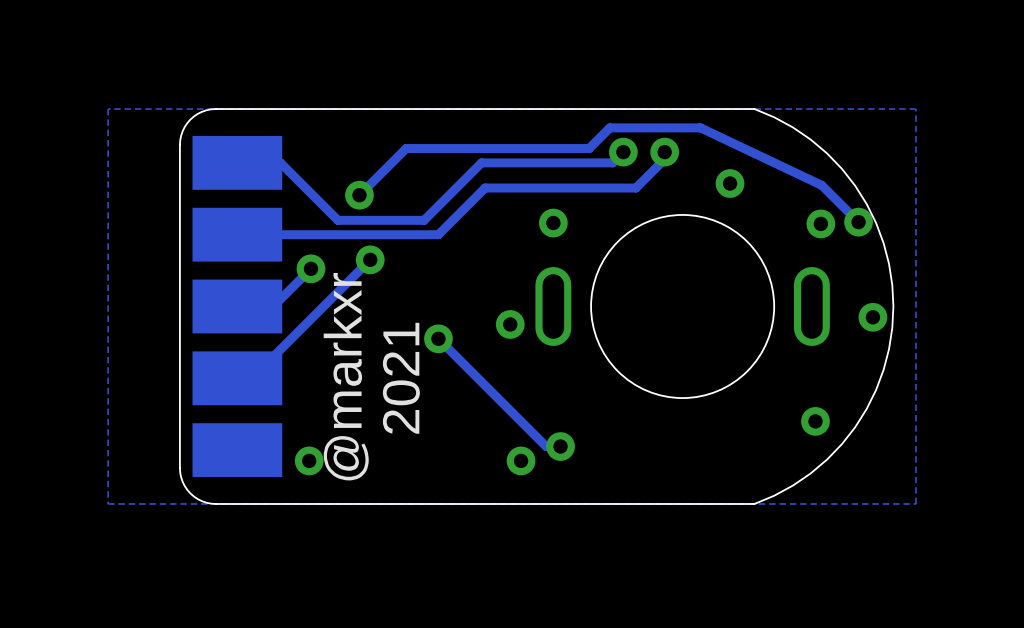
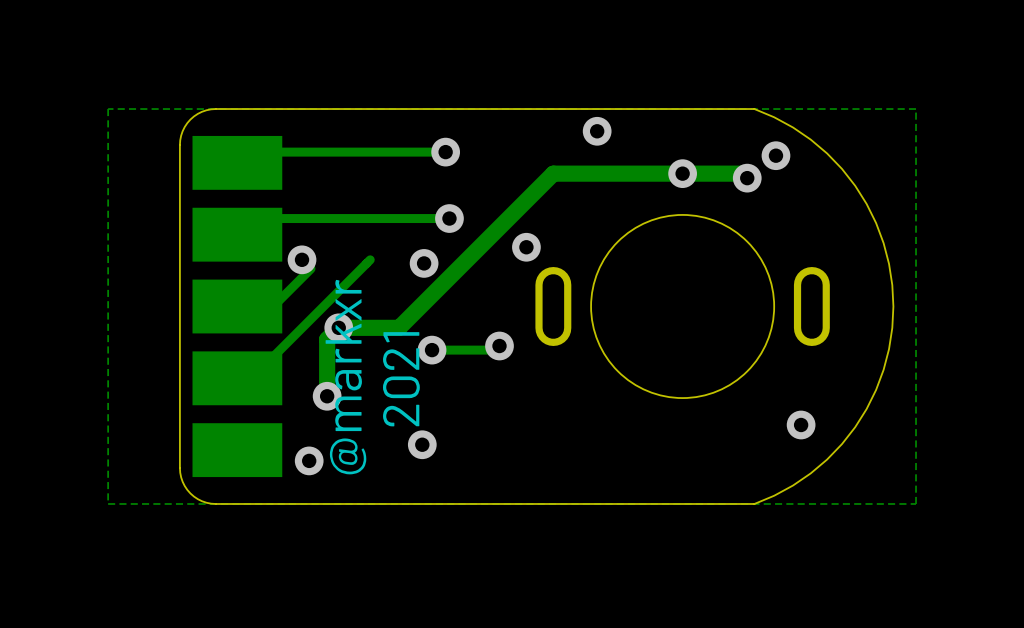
via: none -> (445, 152)
track: (623, 152) (612, 162) (481, 162) (424, 220) (337, 220) (280, 162) (237, 162) -> (445, 152) (248, 152) (237, 162)
via position: (623, 152) -> (597, 131)
track: (664, 152) (664, 159) (635, 188) (485, 188) (438, 234) (237, 234) -> (449, 218) (253, 218) (237, 234)
via position: (664, 152) -> (682, 173)
via: none -> (775, 155)
track: none -> (747, 178) (742, 173) (553, 173) (399, 327) (338, 327) (327, 339) (327, 396)
via position: (730, 183) -> (747, 178)
track: (359, 195) (406, 148) (589, 148) (609, 127) (700, 127) (821, 185) (858, 222) -> none
via: (359, 195) -> none
via: none -> (449, 218)
via: (858, 222) -> none
via position: (553, 223) -> (526, 247)
via: (820, 223) -> none
via: (370, 259) -> none
via: none -> (424, 263)
via position: (310, 268) -> (302, 259)
via: (872, 317) -> none
via position: (510, 324) -> (499, 346)
via: none -> (338, 327)
track: (438, 338) (546, 446) (560, 446) -> none
via position: (438, 338) -> (432, 350)
track: none -> (499, 346) (495, 350) (432, 350)
via: none -> (327, 396)
via position: (815, 421) -> (801, 424)
via: none -> (422, 444)
via: (560, 446) -> none
via: (521, 460) -> none

